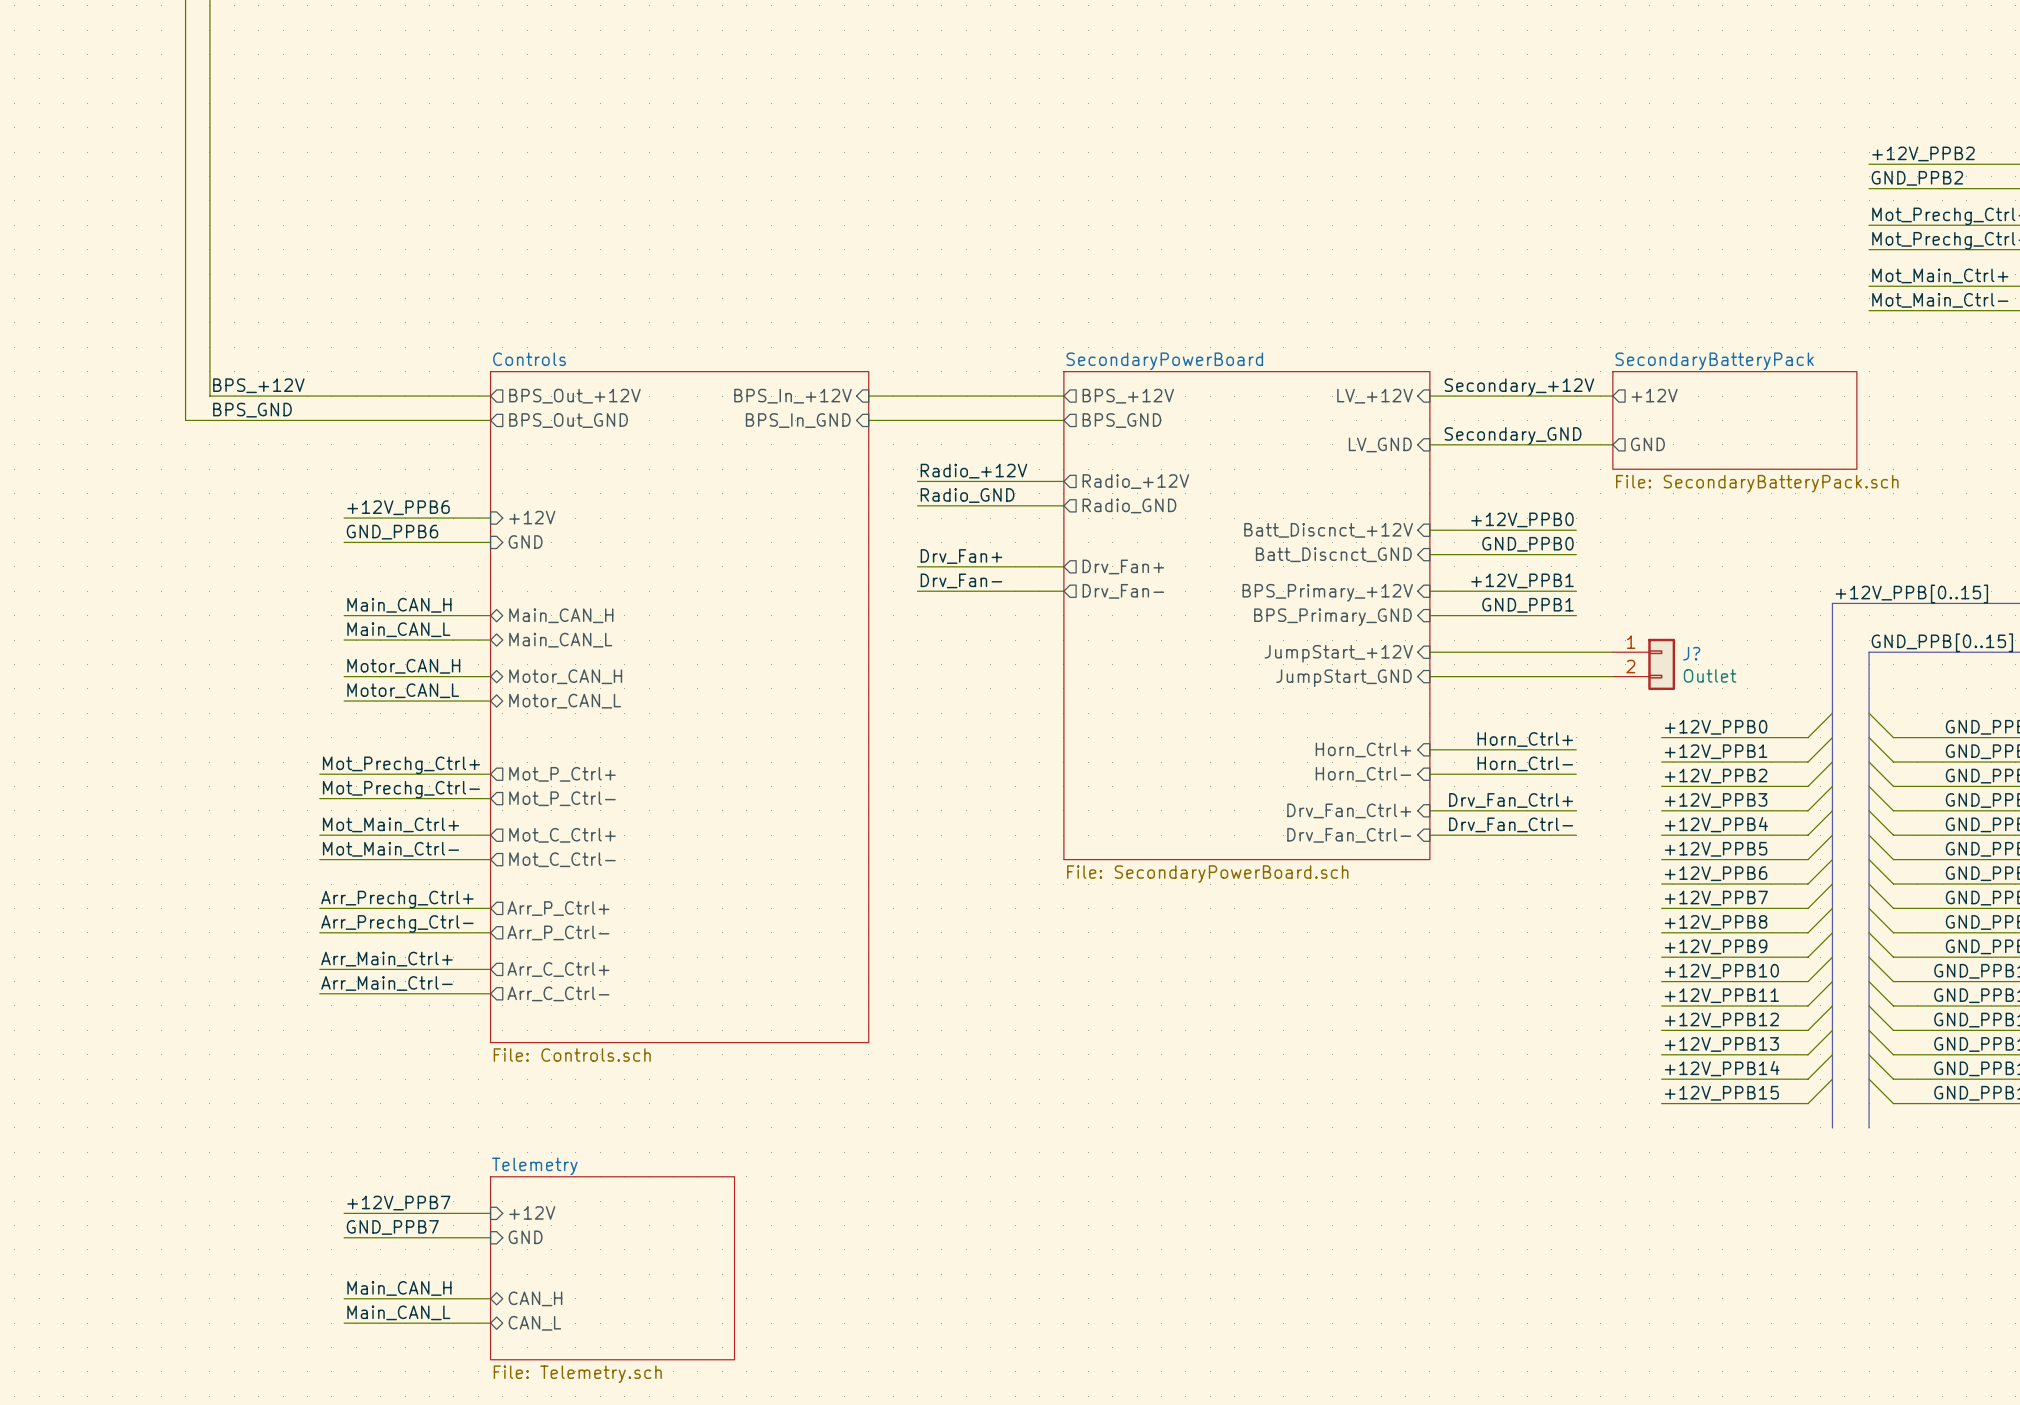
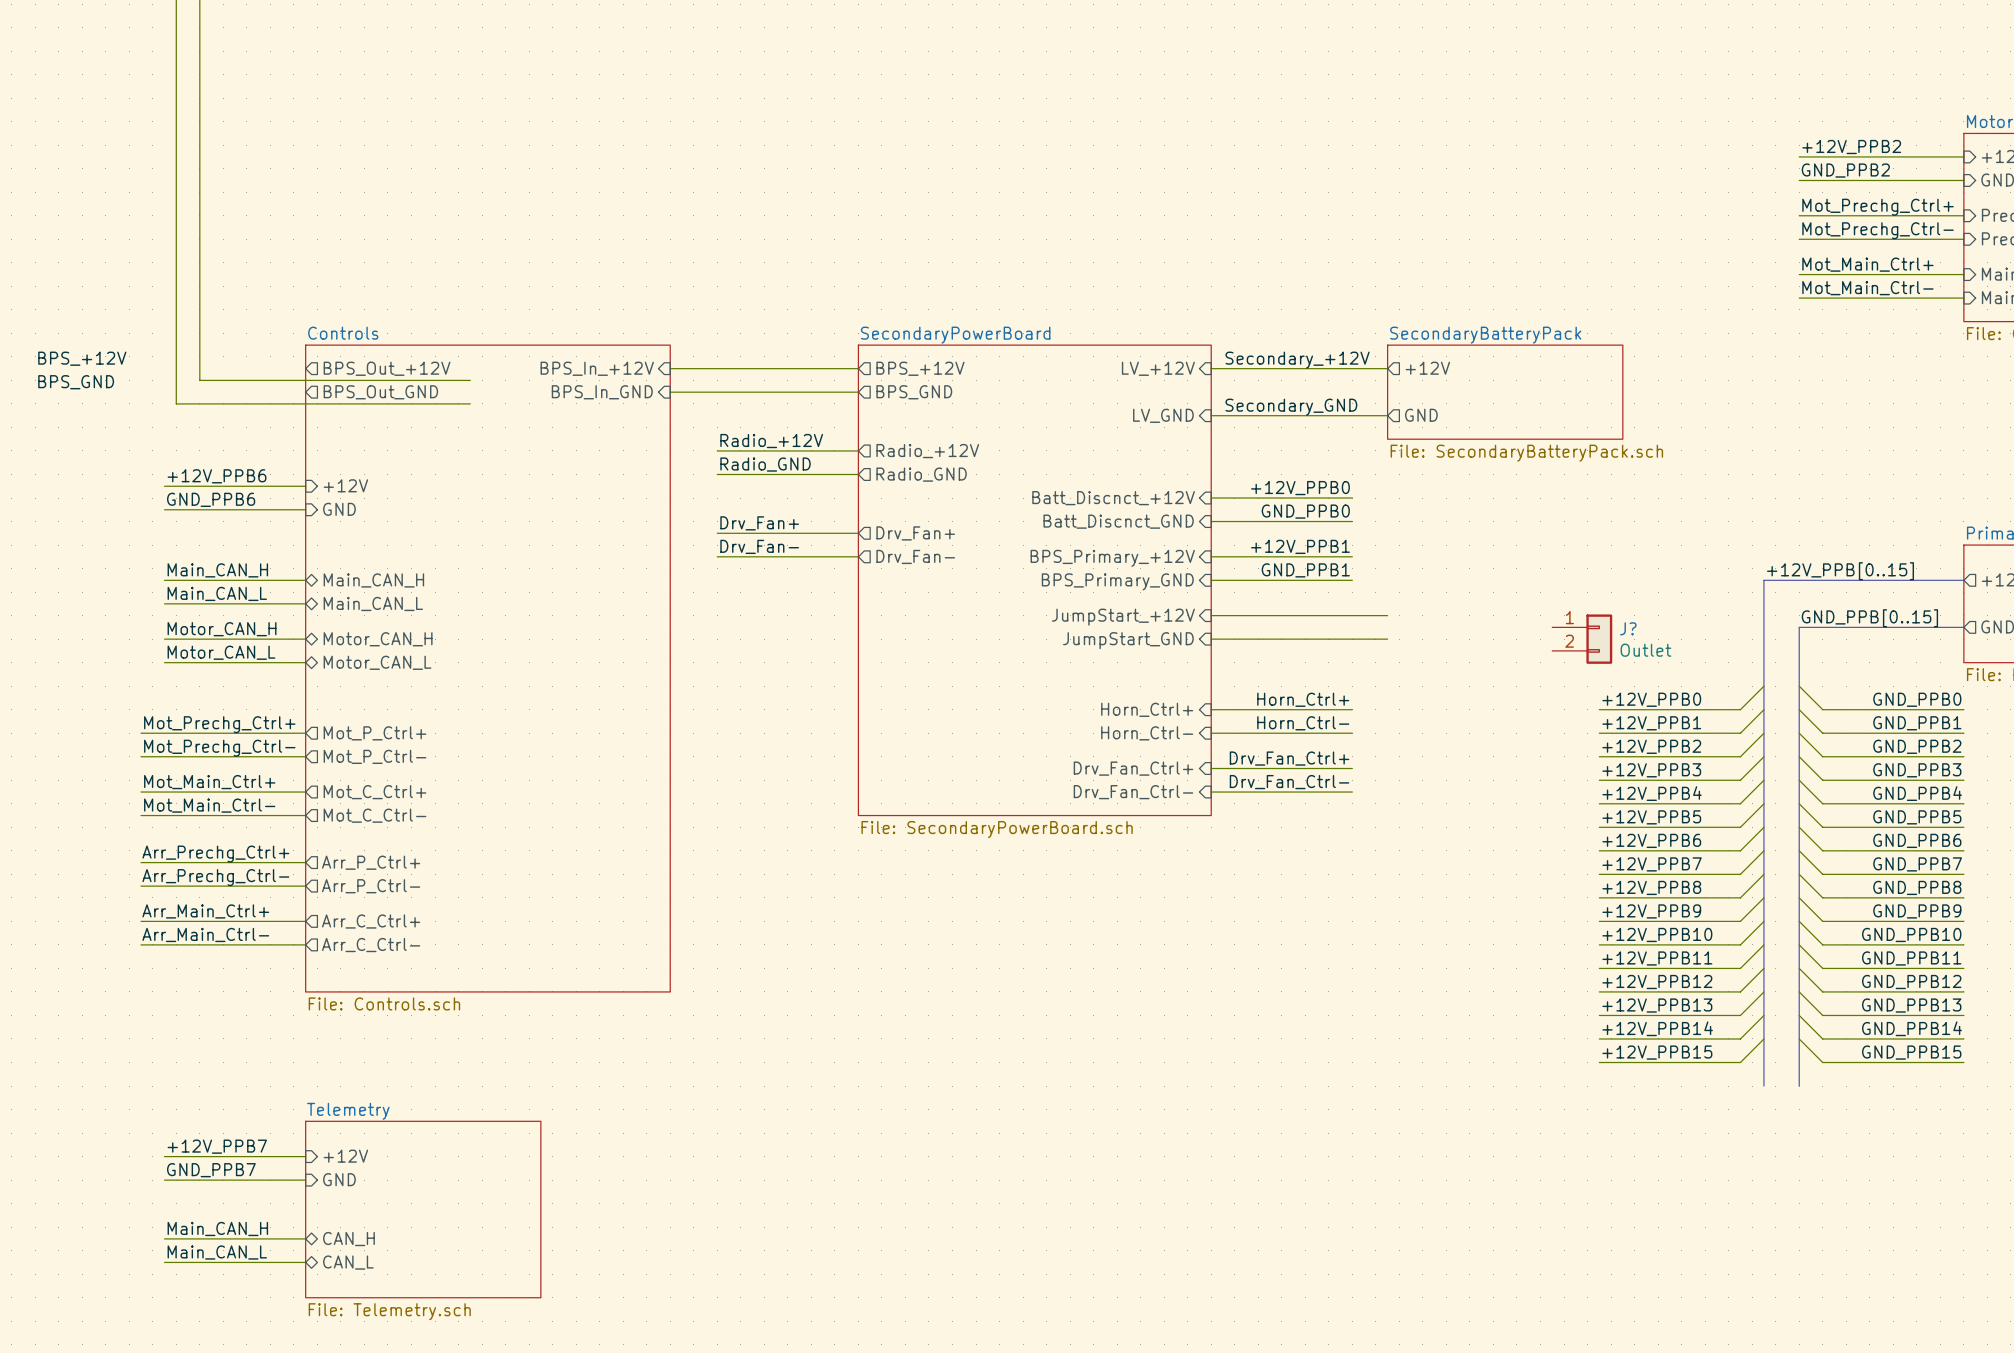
label position: BPS_+12V (258, 385) -> BPS_+12V (82, 358)
label position: Secondary_+12V (1519, 387) -> Secondary_+12V (1297, 360)
sheet pin position: +12V (1654, 395) -> +12V (1427, 368)
sheet pin position: BPS_Out_+12V (574, 396) -> BPS_Out_+12V (387, 368)
sheet pin position: BPS_In_+12V (793, 396) -> BPS_In_+12V (597, 368)
wire: (868, 396) (1063, 396) -> (670, 368) (858, 368)
sheet pin position: BPS_+12V (1128, 396) -> BPS_+12V (920, 368)
sheet pin position: LV_+12V (1375, 396) -> LV_+12V (1158, 368)
wire: (1429, 396) (1612, 396) -> (1211, 368) (1387, 368)
label position: BPS_GND (252, 410) -> BPS_GND (76, 382)
sheet pin position: BPS_Out_GND (568, 420) -> BPS_Out_GND (380, 392)
sheet pin position: BPS_In_GND (798, 420) -> BPS_In_GND (602, 392)
wire: (868, 420) (1063, 420) -> (670, 392) (858, 392)
sheet pin position: BPS_GND (1121, 420) -> BPS_GND (914, 392)
sheet SecondaryBatteryPack position: (1734, 420) -> (1505, 392)
label position: Secondary_GND (1513, 435) -> Secondary_GND (1291, 407)
sheet pin position: LV_GND (1380, 444) -> LV_GND (1163, 415)
wire: (1429, 444) (1612, 444) -> (1211, 415) (1387, 415)
sheet pin position: GND (1647, 444) -> GND (1421, 415)
label position: Radio_+12V (973, 471) -> Radio_+12V (771, 441)
wire: (917, 481) (1063, 481) -> (717, 450) (858, 450)
sheet pin position: Radio_+12V (1135, 481) -> Radio_+12V (927, 451)
label position: Radio_GND (967, 495) -> Radio_GND (765, 464)
wire: (917, 505) (1063, 505) -> (717, 474) (858, 474)
sheet pin position: Radio_GND (1129, 505) -> Radio_GND (921, 474)
label position: +12V_PPB6 (398, 507) -> +12V_PPB6 (216, 476)
sheet pin position: +12V (532, 517) -> +12V (345, 485)
wire: (344, 518) (490, 518) -> (164, 486) (305, 486)
label position: +12V_PPB0 (1522, 519) -> +12V_PPB0 (1300, 488)
sheet pin position: Batt_Discnct_+12V (1328, 530) -> Batt_Discnct_+12V (1113, 498)
wire: (1429, 530) (1576, 530) -> (1211, 498) (1352, 498)
label position: GND_PPB6 (392, 532) -> GND_PPB6 (211, 499)
sheet pin position: GND (525, 541) -> GND (339, 509)
wire: (344, 542) (490, 542) -> (164, 509) (305, 509)
label position: GND_PPB0 (1527, 544) -> GND_PPB0 (1305, 511)
sheet pin position: Batt_Discnct_GND (1333, 554) -> Batt_Discnct_GND (1118, 521)
wire: (1429, 554) (1576, 554) -> (1211, 521) (1352, 521)
label position: Drv_Fan+ (961, 556) -> Drv_Fan+ (759, 523)
wire: (917, 566) (1063, 566) -> (717, 533) (858, 533)
sheet pin position: Drv_Fan+ (1123, 566) -> Drv_Fan+ (915, 533)
label position: Drv_Fan- (961, 580) -> Drv_Fan- (759, 546)
label position: +12V_PPB1 (1522, 580) -> +12V_PPB1 (1300, 546)
wire: (917, 591) (1063, 591) -> (717, 556) (858, 556)
sheet pin position: Drv_Fan- (1123, 591) -> Drv_Fan- (915, 556)
wire: (1429, 591) (1576, 591) -> (1211, 556) (1352, 556)
sheet pin position: BPS_Primary_+12V (1327, 592) -> BPS_Primary_+12V (1112, 558)
label position: Main_CAN_H (399, 605) -> Main_CAN_H (217, 570)
label position: GND_PPB1 (1527, 605) -> GND_PPB1 (1305, 570)
wire: (344, 615) (490, 615) -> (164, 580) (305, 580)
sheet pin position: Main_CAN_H (561, 615) -> Main_CAN_H (373, 580)
sheet SecondaryPowerBoard position: (1246, 615) -> (1034, 580)
wire: (1429, 615) (1576, 615) -> (1211, 580) (1352, 580)
sheet pin position: BPS_Primary_GND (1332, 617) -> BPS_Primary_GND (1117, 581)
label position: Main_CAN_L (398, 629) -> Main_CAN_L (217, 593)
wire: (344, 640) (490, 640) -> (164, 603) (305, 603)
sheet pin position: Main_CAN_L (560, 640) -> Main_CAN_L (373, 603)
wire: (1429, 652) (1612, 652) -> (1211, 615) (1387, 615)
sheet pin position: JumpStart_+12V (1338, 653) -> JumpStart_+12V (1123, 617)
label position: Motor_CAN_H (403, 666) -> Motor_CAN_H (222, 629)
wire: (344, 676) (490, 676) -> (164, 639) (305, 639)
sheet pin position: Motor_CAN_H (565, 676) -> Motor_CAN_H (378, 639)
wire: (1429, 676) (1612, 676) -> (1211, 639) (1387, 639)
sheet pin position: JumpStart_GND (1344, 678) -> JumpStart_GND (1128, 640)
label position: Motor_CAN_L (403, 690) -> Motor_CAN_L (221, 652)
wire: (344, 701) (490, 701) -> (164, 662) (305, 662)
sheet pin position: Motor_CAN_L (565, 701) -> Motor_CAN_L (377, 662)
sheet Controls position: (679, 707) -> (487, 668)
label position: Horn_Ctrl+ (1525, 739) -> Horn_Ctrl+ (1303, 699)
sheet pin position: Horn_Ctrl+ (1363, 749) -> Horn_Ctrl+ (1147, 709)
wire: (1429, 749) (1576, 749) -> (1211, 709) (1352, 709)
label position: Horn_Ctrl- (1525, 763) -> Horn_Ctrl- (1303, 723)
label position: Mot_Prechg_Ctrl+ (401, 765) -> Mot_Prechg_Ctrl+ (219, 724)
wire: (319, 774) (490, 774) -> (141, 733) (305, 733)
sheet pin position: Mot_P_Ctrl+ (562, 774) -> Mot_P_Ctrl+ (375, 733)
sheet pin position: Horn_Ctrl- (1363, 774) -> Horn_Ctrl- (1147, 733)
wire: (1429, 774) (1576, 774) -> (1211, 733) (1352, 733)
label position: Mot_Prechg_Ctrl- (401, 789) -> Mot_Prechg_Ctrl- (219, 748)
wire: (319, 798) (490, 798) -> (141, 756) (305, 756)
sheet pin position: Mot_P_Ctrl- (562, 798) -> Mot_P_Ctrl- (375, 756)
label position: Drv_Fan_Ctrl+ (1511, 800) -> Drv_Fan_Ctrl+ (1289, 758)
sheet pin position: Drv_Fan_Ctrl+ (1349, 810) -> Drv_Fan_Ctrl+ (1133, 768)
wire: (1429, 810) (1576, 810) -> (1211, 768) (1352, 768)
label position: Mot_Main_Ctrl+ (391, 824) -> Mot_Main_Ctrl+ (209, 782)
label position: Drv_Fan_Ctrl- (1511, 824) -> Drv_Fan_Ctrl- (1289, 782)
wire: (319, 835) (490, 835) -> (141, 792) (305, 792)
sheet pin position: Mot_C_Ctrl+ (562, 835) -> Mot_C_Ctrl+ (375, 792)
sheet pin position: Drv_Fan_Ctrl- (1349, 835) -> Drv_Fan_Ctrl- (1133, 792)
wire: (1429, 835) (1576, 835) -> (1211, 792) (1352, 792)
label position: Mot_Main_Ctrl- (391, 849) -> Mot_Main_Ctrl- (209, 805)
wire: (319, 859) (490, 859) -> (141, 815) (305, 815)
sheet pin position: Mot_C_Ctrl- (562, 859) -> Mot_C_Ctrl- (375, 815)
label position: Arr_Prechg_Ctrl+ (397, 899) -> Arr_Prechg_Ctrl+ (215, 854)
wire: (319, 908) (490, 908) -> (141, 862) (305, 862)
sheet pin position: Arr_P_Ctrl+ (558, 908) -> Arr_P_Ctrl+ (371, 862)
label position: Arr_Prechg_Ctrl- (397, 923) -> Arr_Prechg_Ctrl- (215, 877)
wire: (319, 932) (490, 932) -> (141, 886) (305, 886)
sheet pin position: Arr_P_Ctrl- (558, 932) -> Arr_P_Ctrl- (371, 886)
label position: Arr_Main_Ctrl+ (386, 959) -> Arr_Main_Ctrl+ (205, 911)
wire: (319, 969) (490, 969) -> (141, 921) (305, 921)
sheet pin position: Arr_C_Ctrl+ (558, 969) -> Arr_C_Ctrl+ (371, 921)
label position: Arr_Main_Ctrl- (386, 983) -> Arr_Main_Ctrl- (205, 934)
wire: (319, 993) (490, 993) -> (141, 944) (305, 944)
sheet pin position: Arr_C_Ctrl- (558, 993) -> Arr_C_Ctrl- (371, 945)
label position: +12V_PPB7 (398, 1203) -> +12V_PPB7 (217, 1146)
sheet pin position: +12V (532, 1212) -> +12V (345, 1156)
wire: (344, 1213) (490, 1213) -> (164, 1156) (305, 1156)
label position: GND_PPB7 (392, 1227) -> GND_PPB7 (211, 1170)
wire: (344, 1237) (490, 1237) -> (164, 1180) (305, 1180)
sheet pin position: GND (525, 1237) -> GND (339, 1179)
sheet Telemetry position: (612, 1268) -> (423, 1209)
label position: Main_CAN_H (399, 1288) -> Main_CAN_H (217, 1228)
wire: (344, 1298) (490, 1298) -> (164, 1238) (305, 1238)
sheet pin position: CAN_H (535, 1298) -> CAN_H (348, 1239)
label position: Main_CAN_L (398, 1312) -> Main_CAN_L (217, 1252)
wire: (344, 1323) (490, 1323) -> (164, 1262) (305, 1262)
sheet pin position: CAN_L (534, 1323) -> CAN_L (348, 1262)

